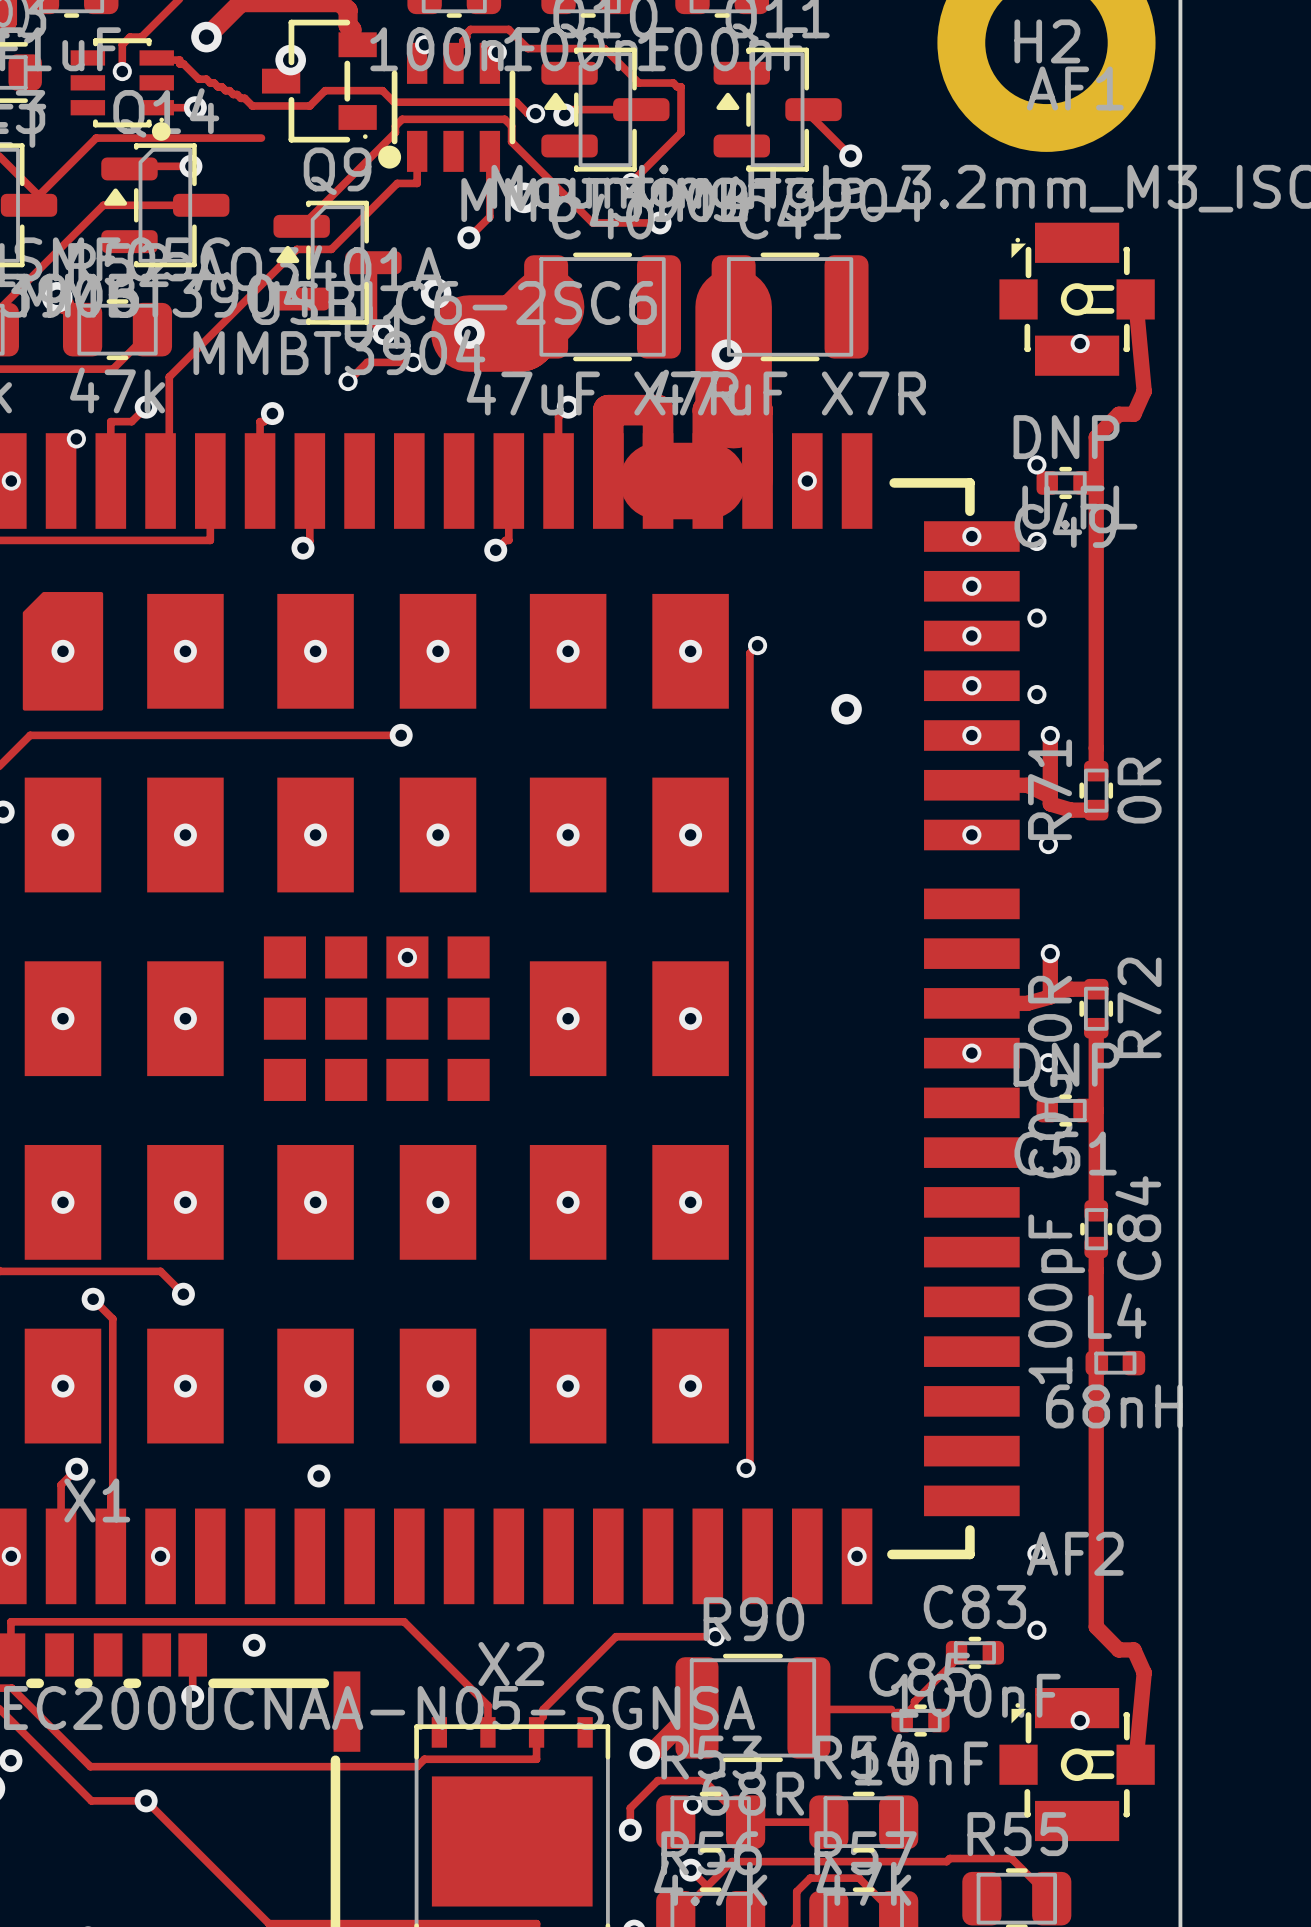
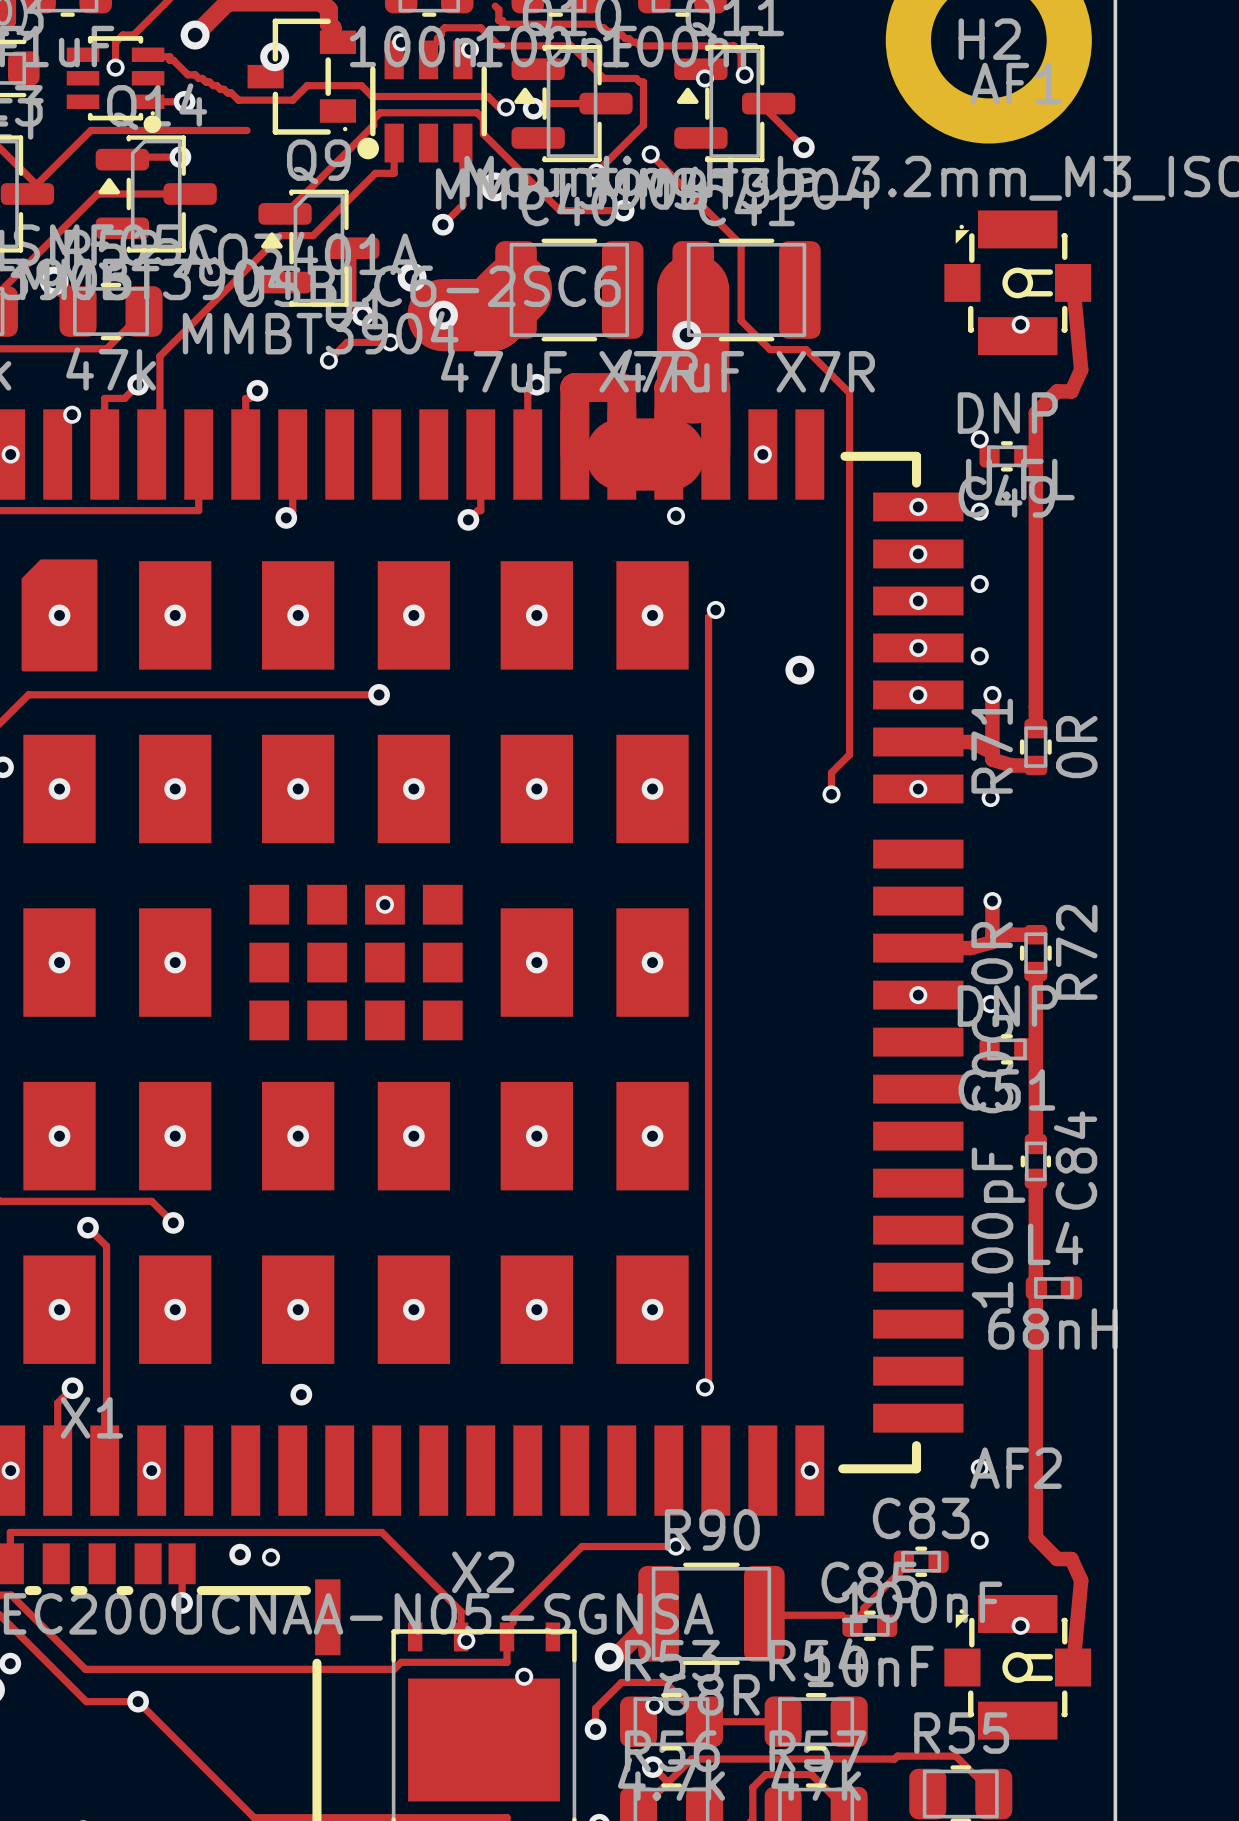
track: none -> (495, 6) (498, 9) (498, 20) (502, 20) (502, 24) (596, 24) (607, 31) (614, 31) (618, 35) (636, 42) (639, 45) (733, 45) (741, 53) (741, 71) (744, 74)
via: none -> (744, 74)
via: none -> (704, 78)
track: none -> (650, 154) (741, 244) (741, 320) (770, 349) (806, 349) (849, 393) (849, 754) (831, 772) (831, 794)
via: none -> (650, 154)
via: none -> (676, 515)
via: none -> (831, 794)
via: none -> (271, 1557)
via: none -> (466, 1640)
via: none -> (524, 1676)

